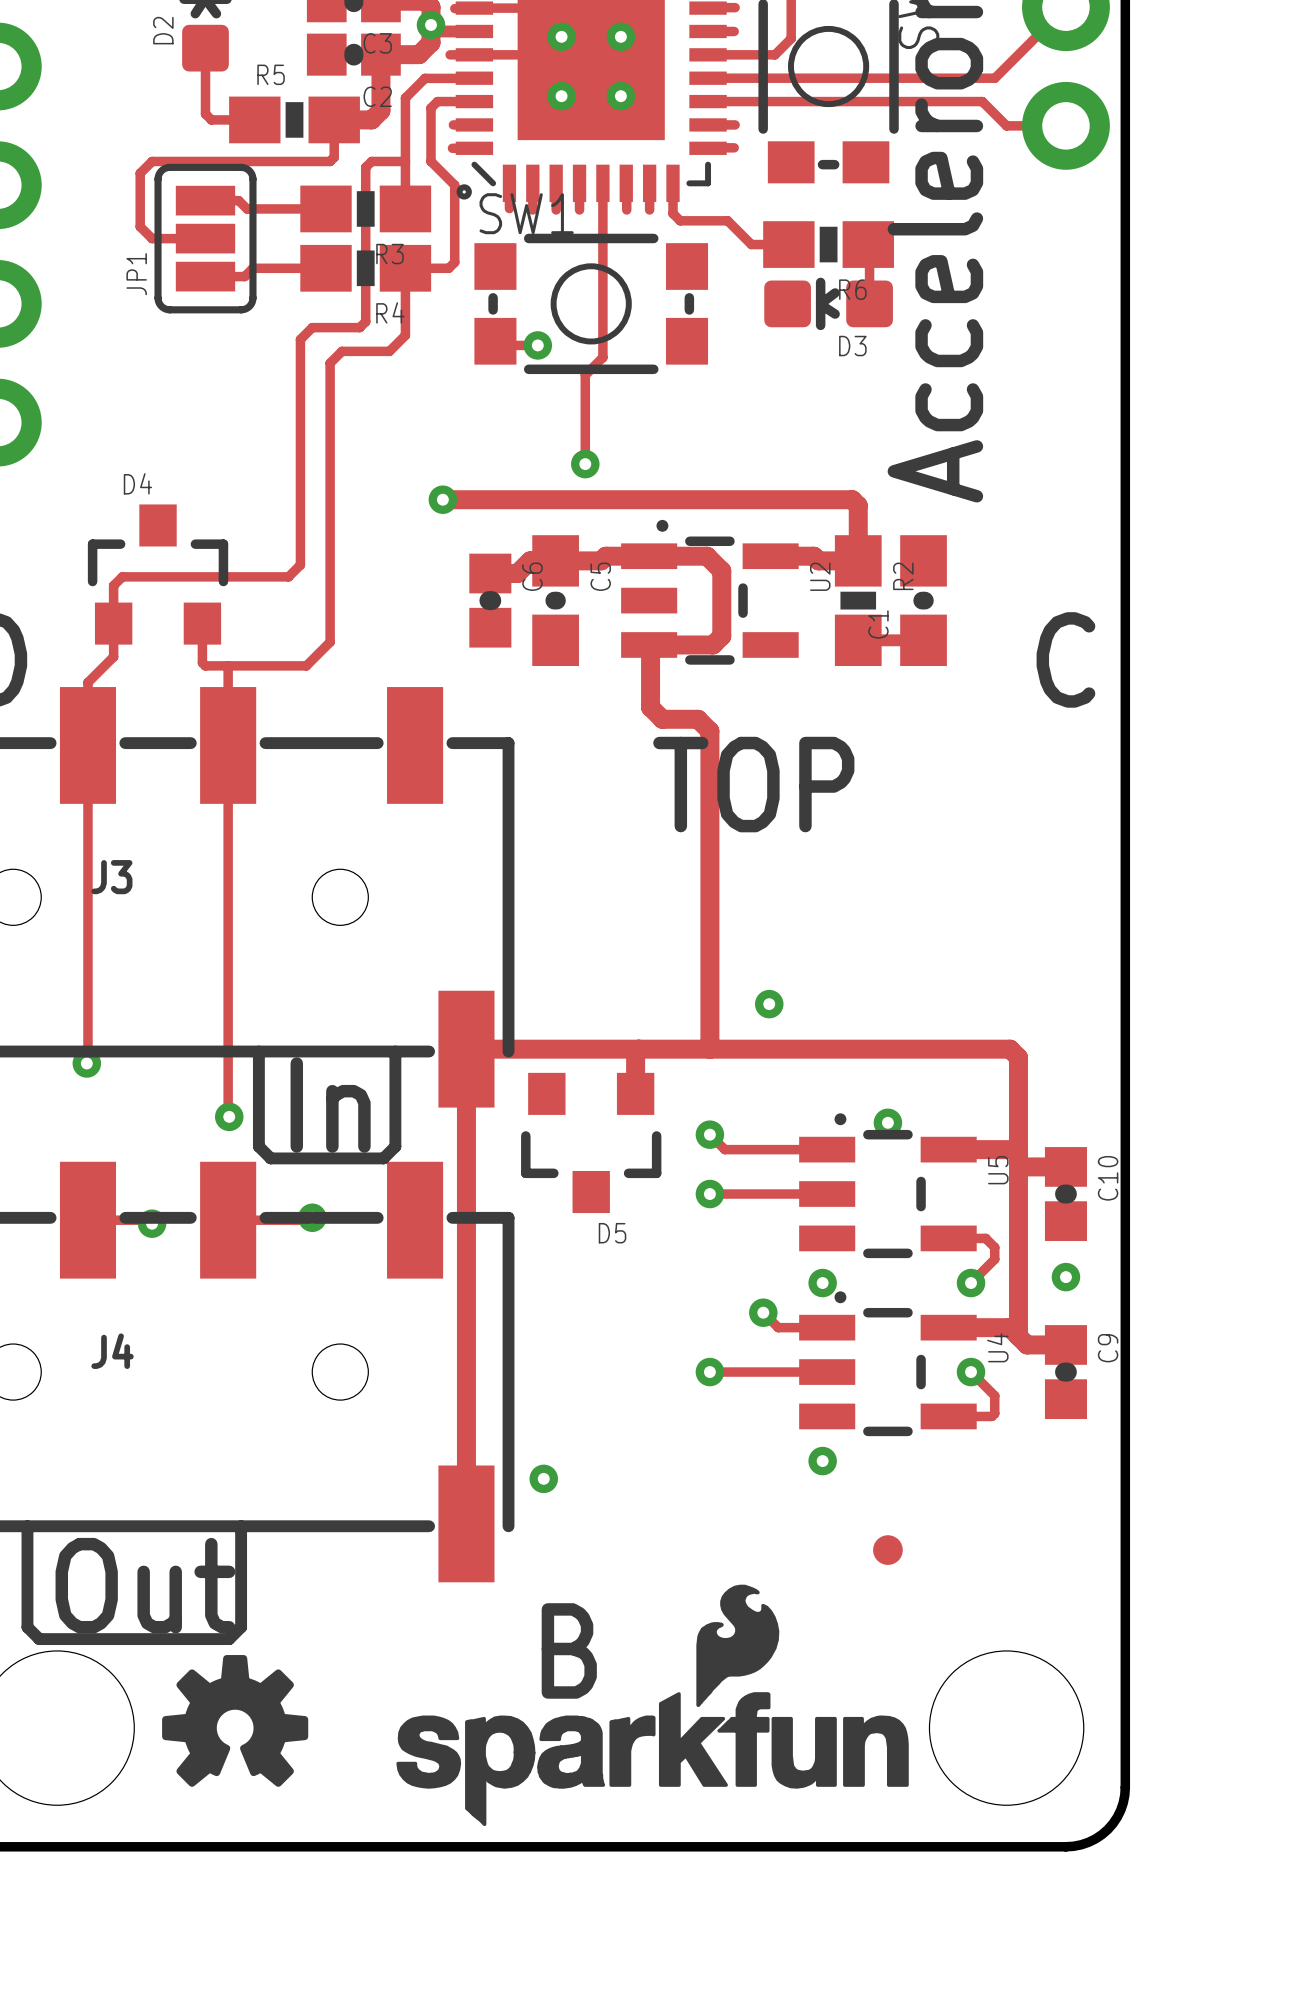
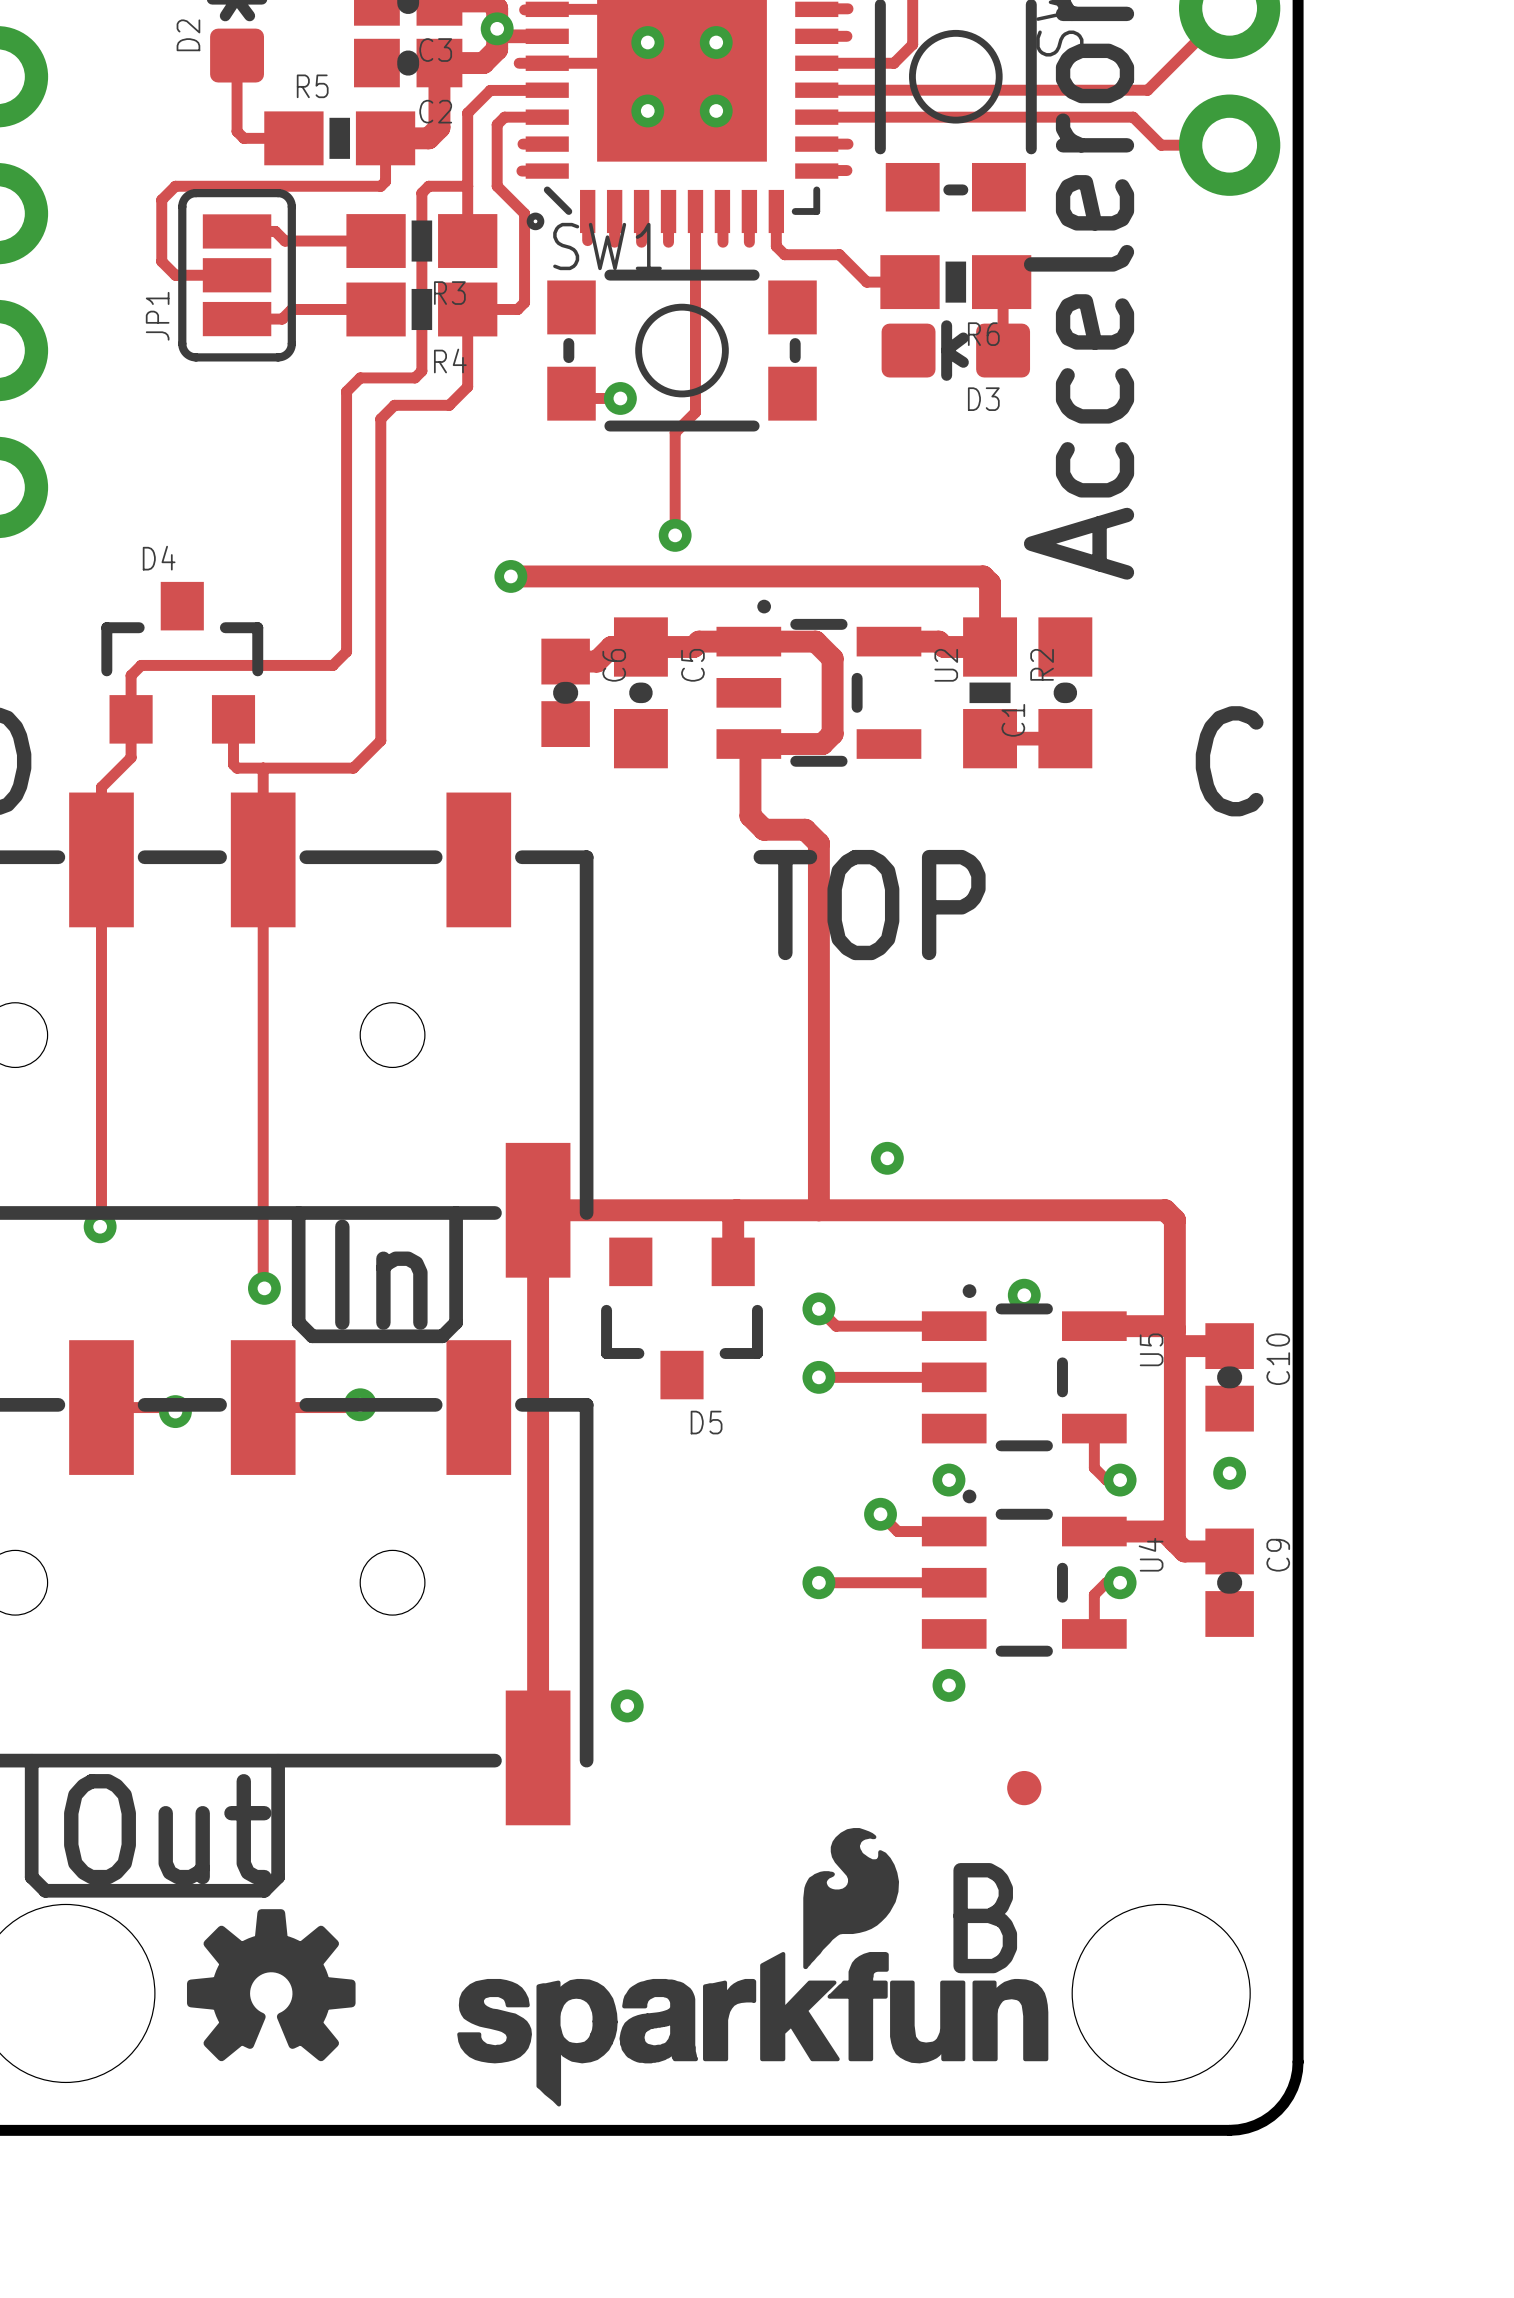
J3 name: J3 (111, 877) -> none
track: (948, 1238) (985, 1238) (994, 1247) (994, 1259) (971, 1283) -> (1094, 1428) (1094, 1467) (1106, 1480) (1120, 1480)
J4 name: J4 (112, 1351) -> none
track: (971, 1372) (994, 1395) (994, 1413) (991, 1416) (948, 1416) -> (1120, 1582) (1106, 1582) (1094, 1594) (1094, 1633)
text position: B (569, 1650) -> B (985, 1918)

